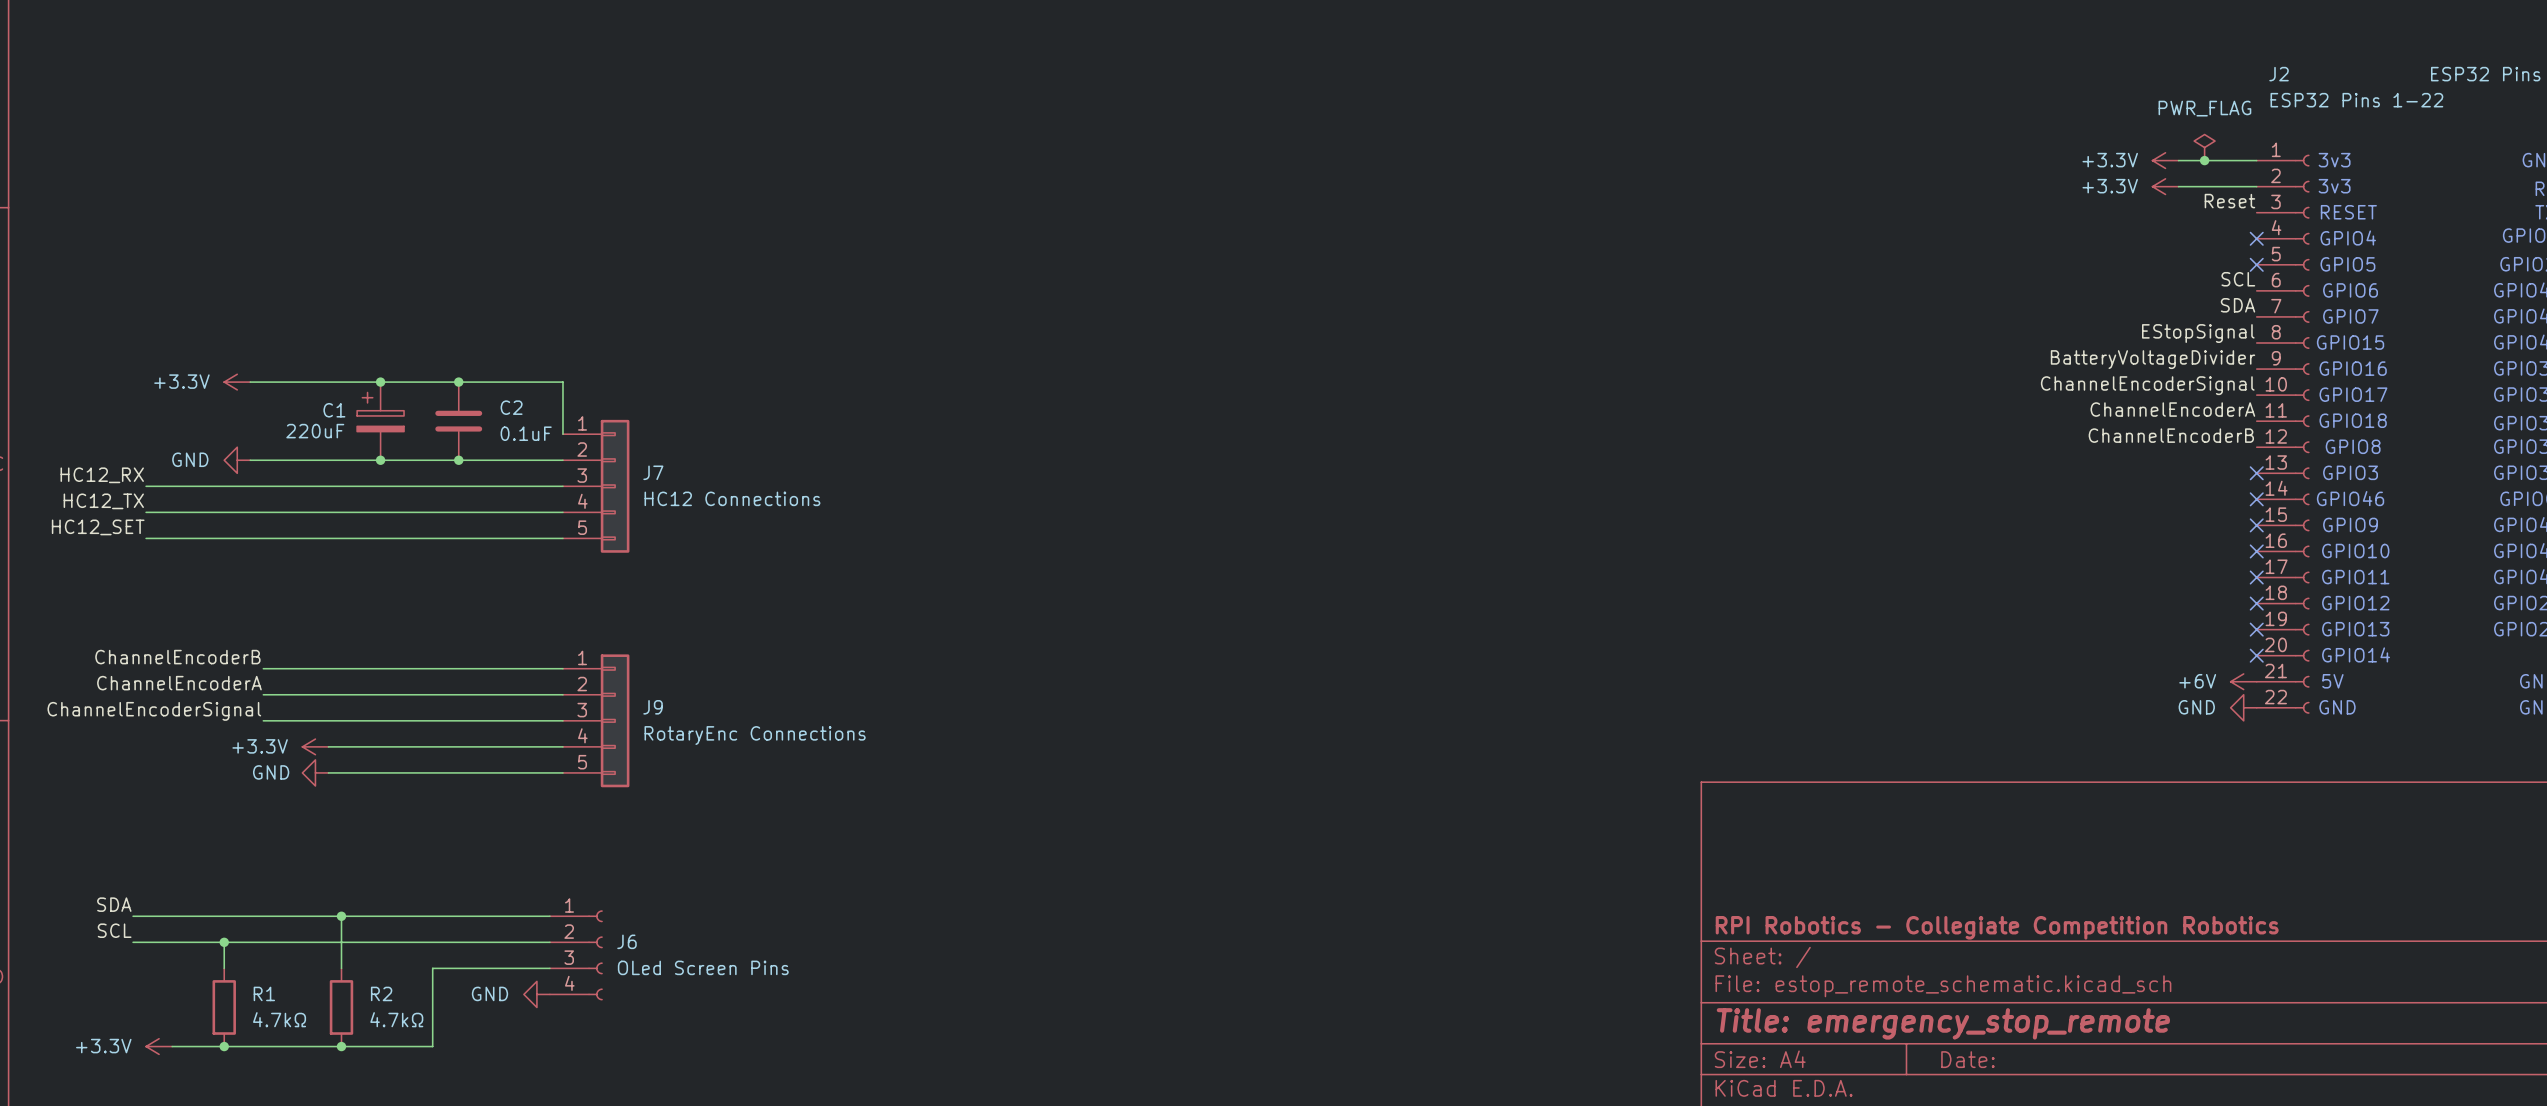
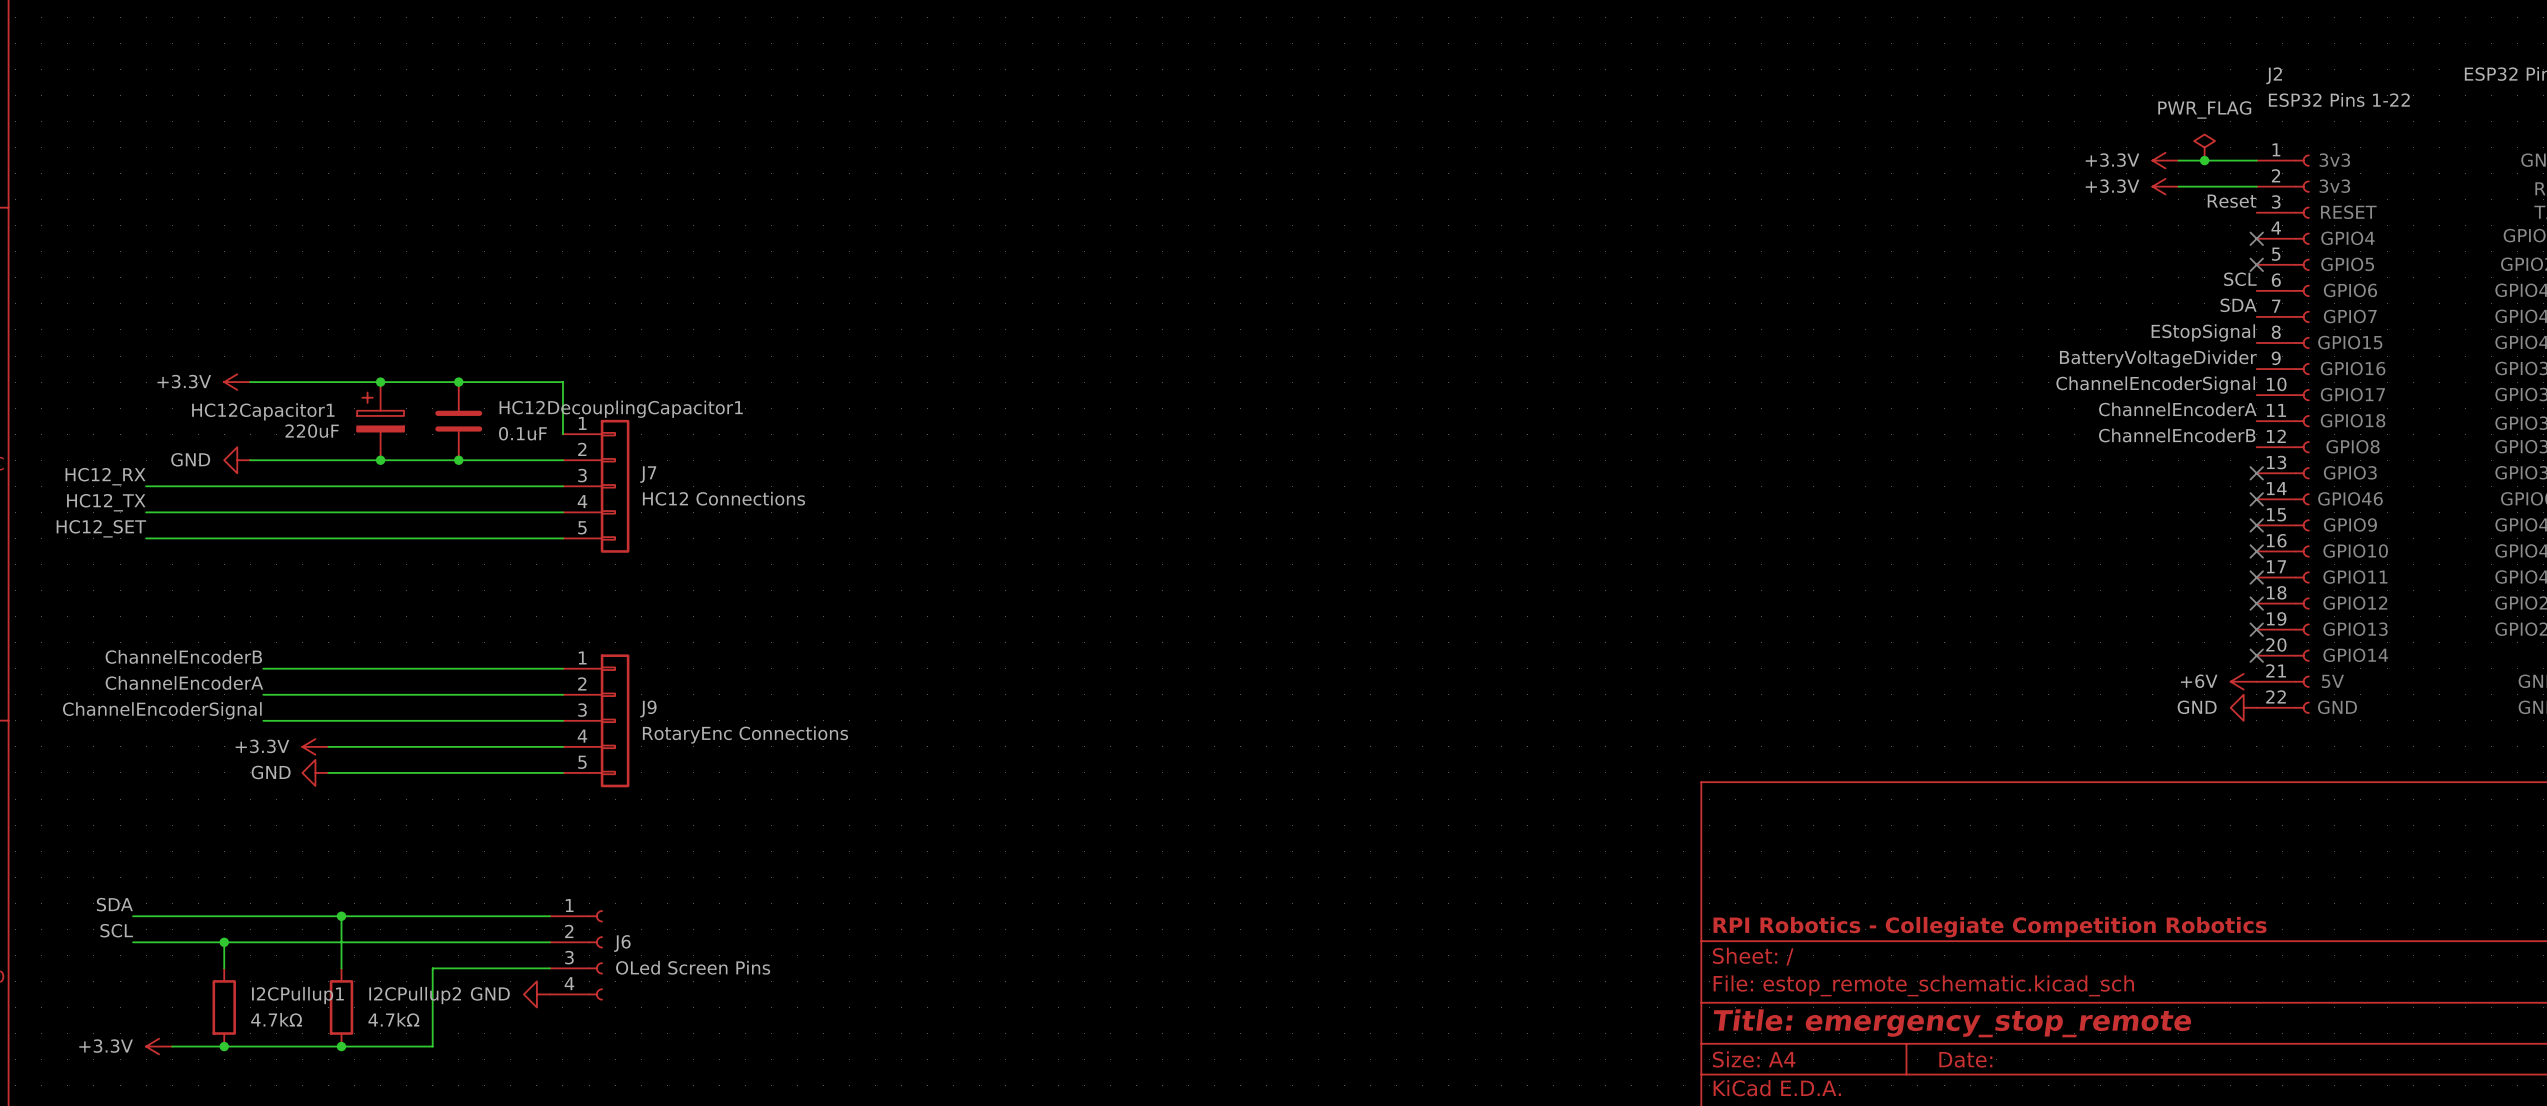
C2 name: C2 (511, 407) -> HC12DecouplingCapacitor1 (621, 409)
C1 name: C1 (334, 410) -> HC12Capacitor1 (263, 411)
R1 name: R1 (264, 993) -> I2CPullup1 (297, 995)
R2 name: R2 (381, 993) -> I2CPullup2 (415, 995)

